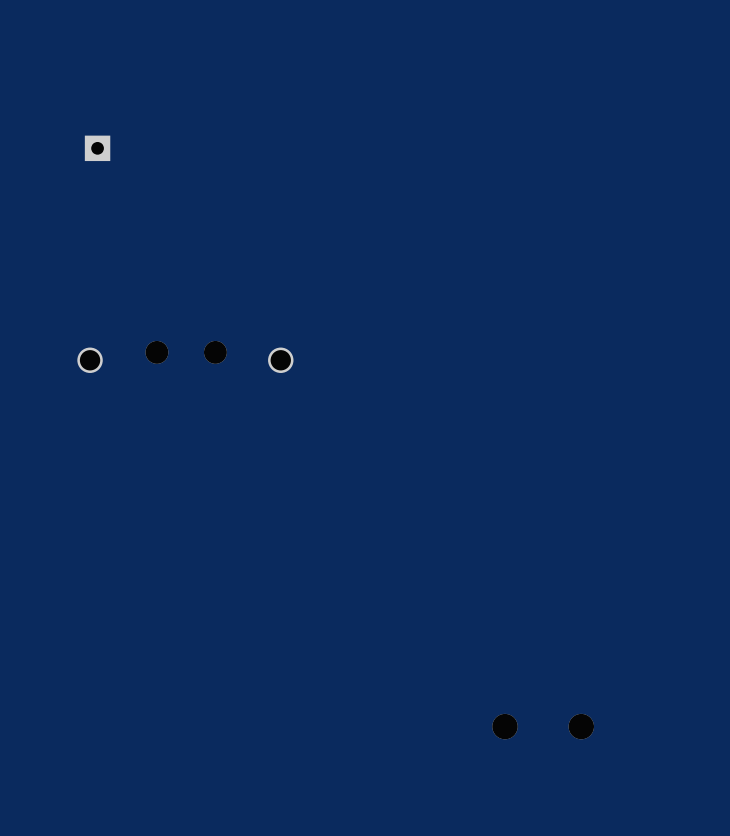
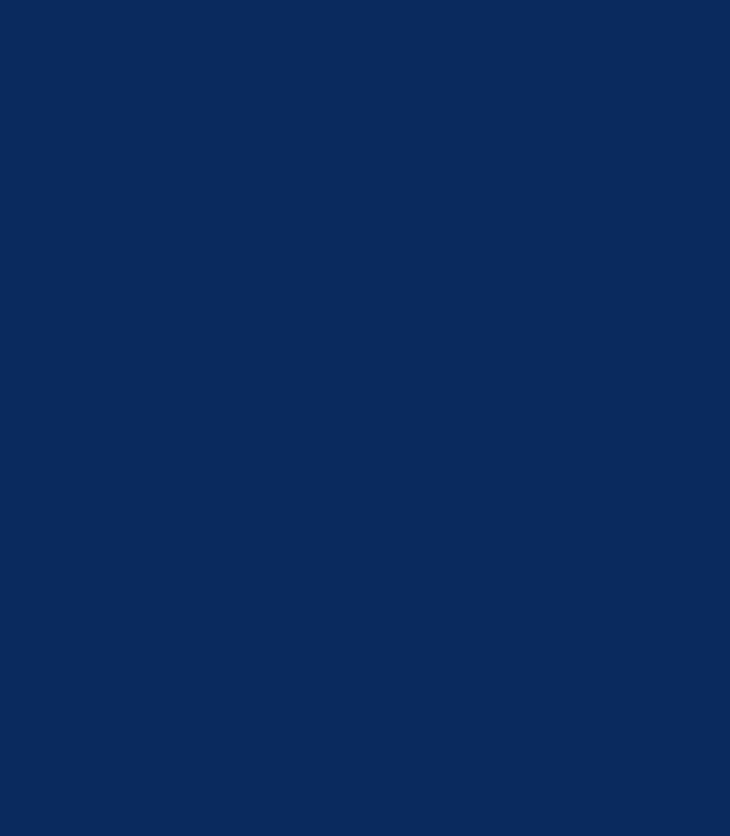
part: (97, 148) -> none
part: (185, 356) -> none
part: (543, 726) -> none

